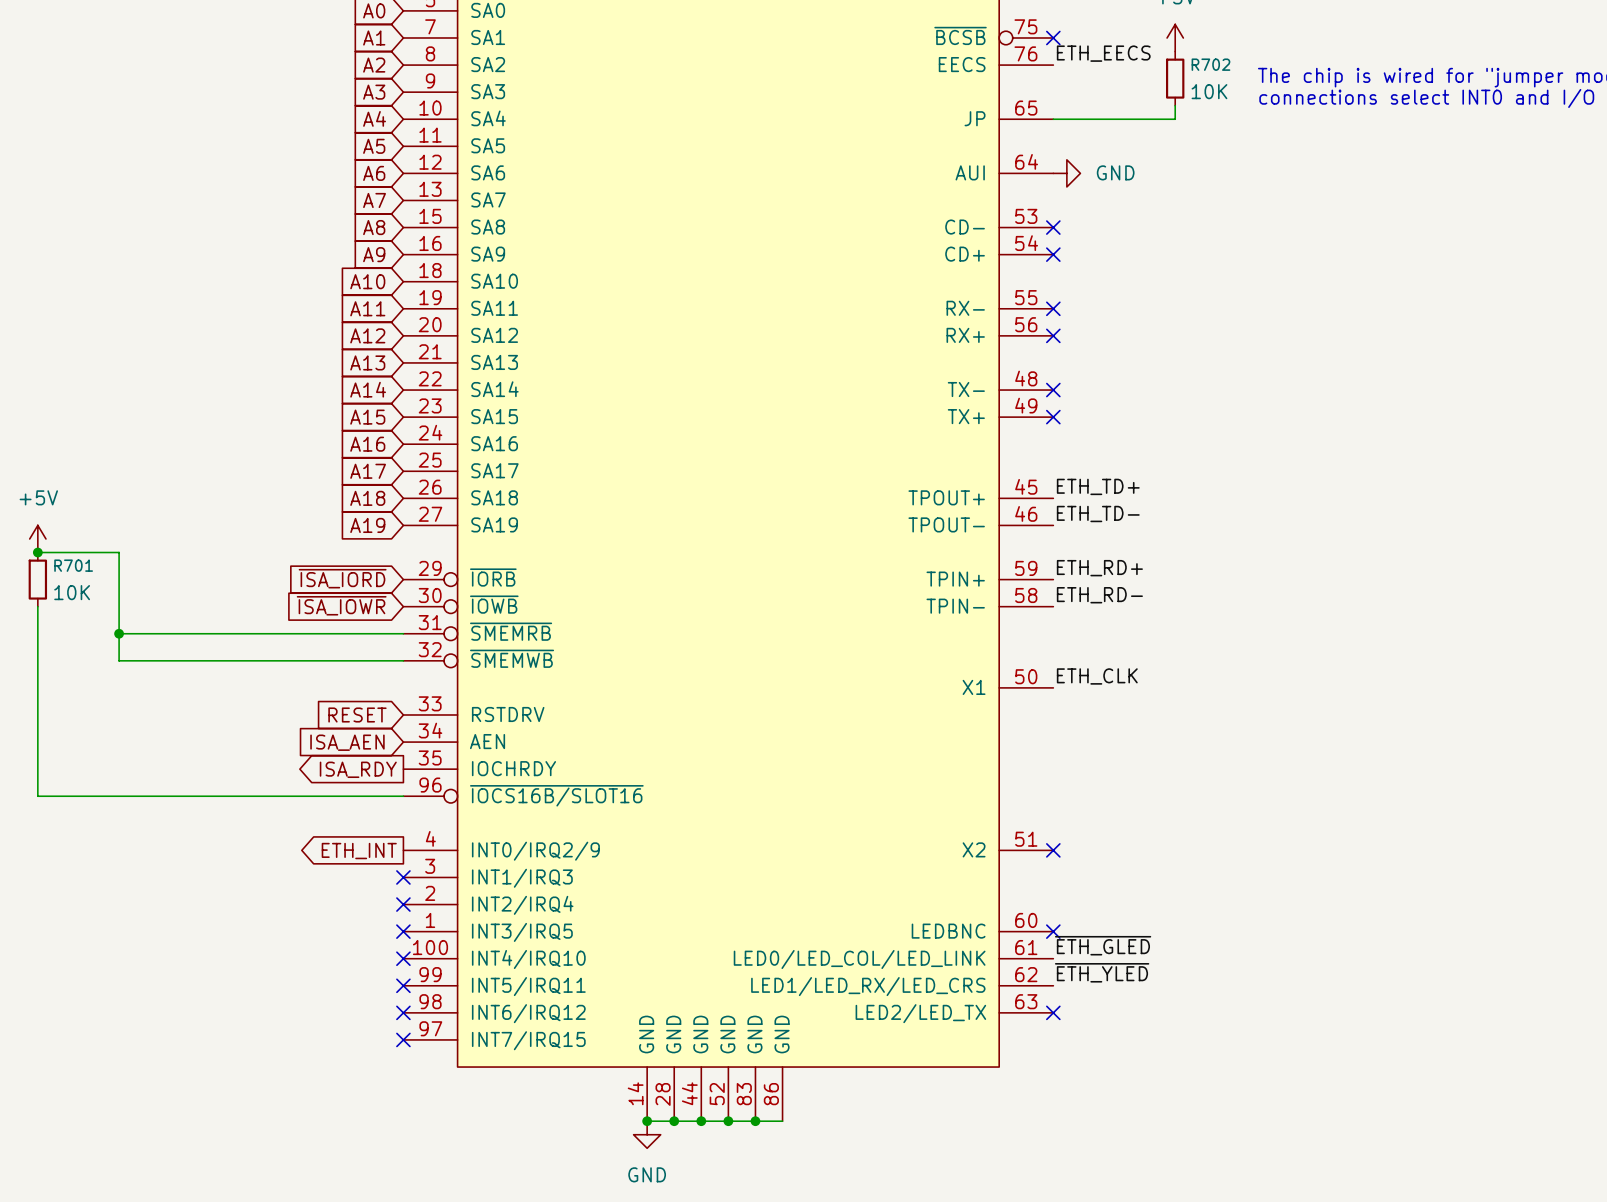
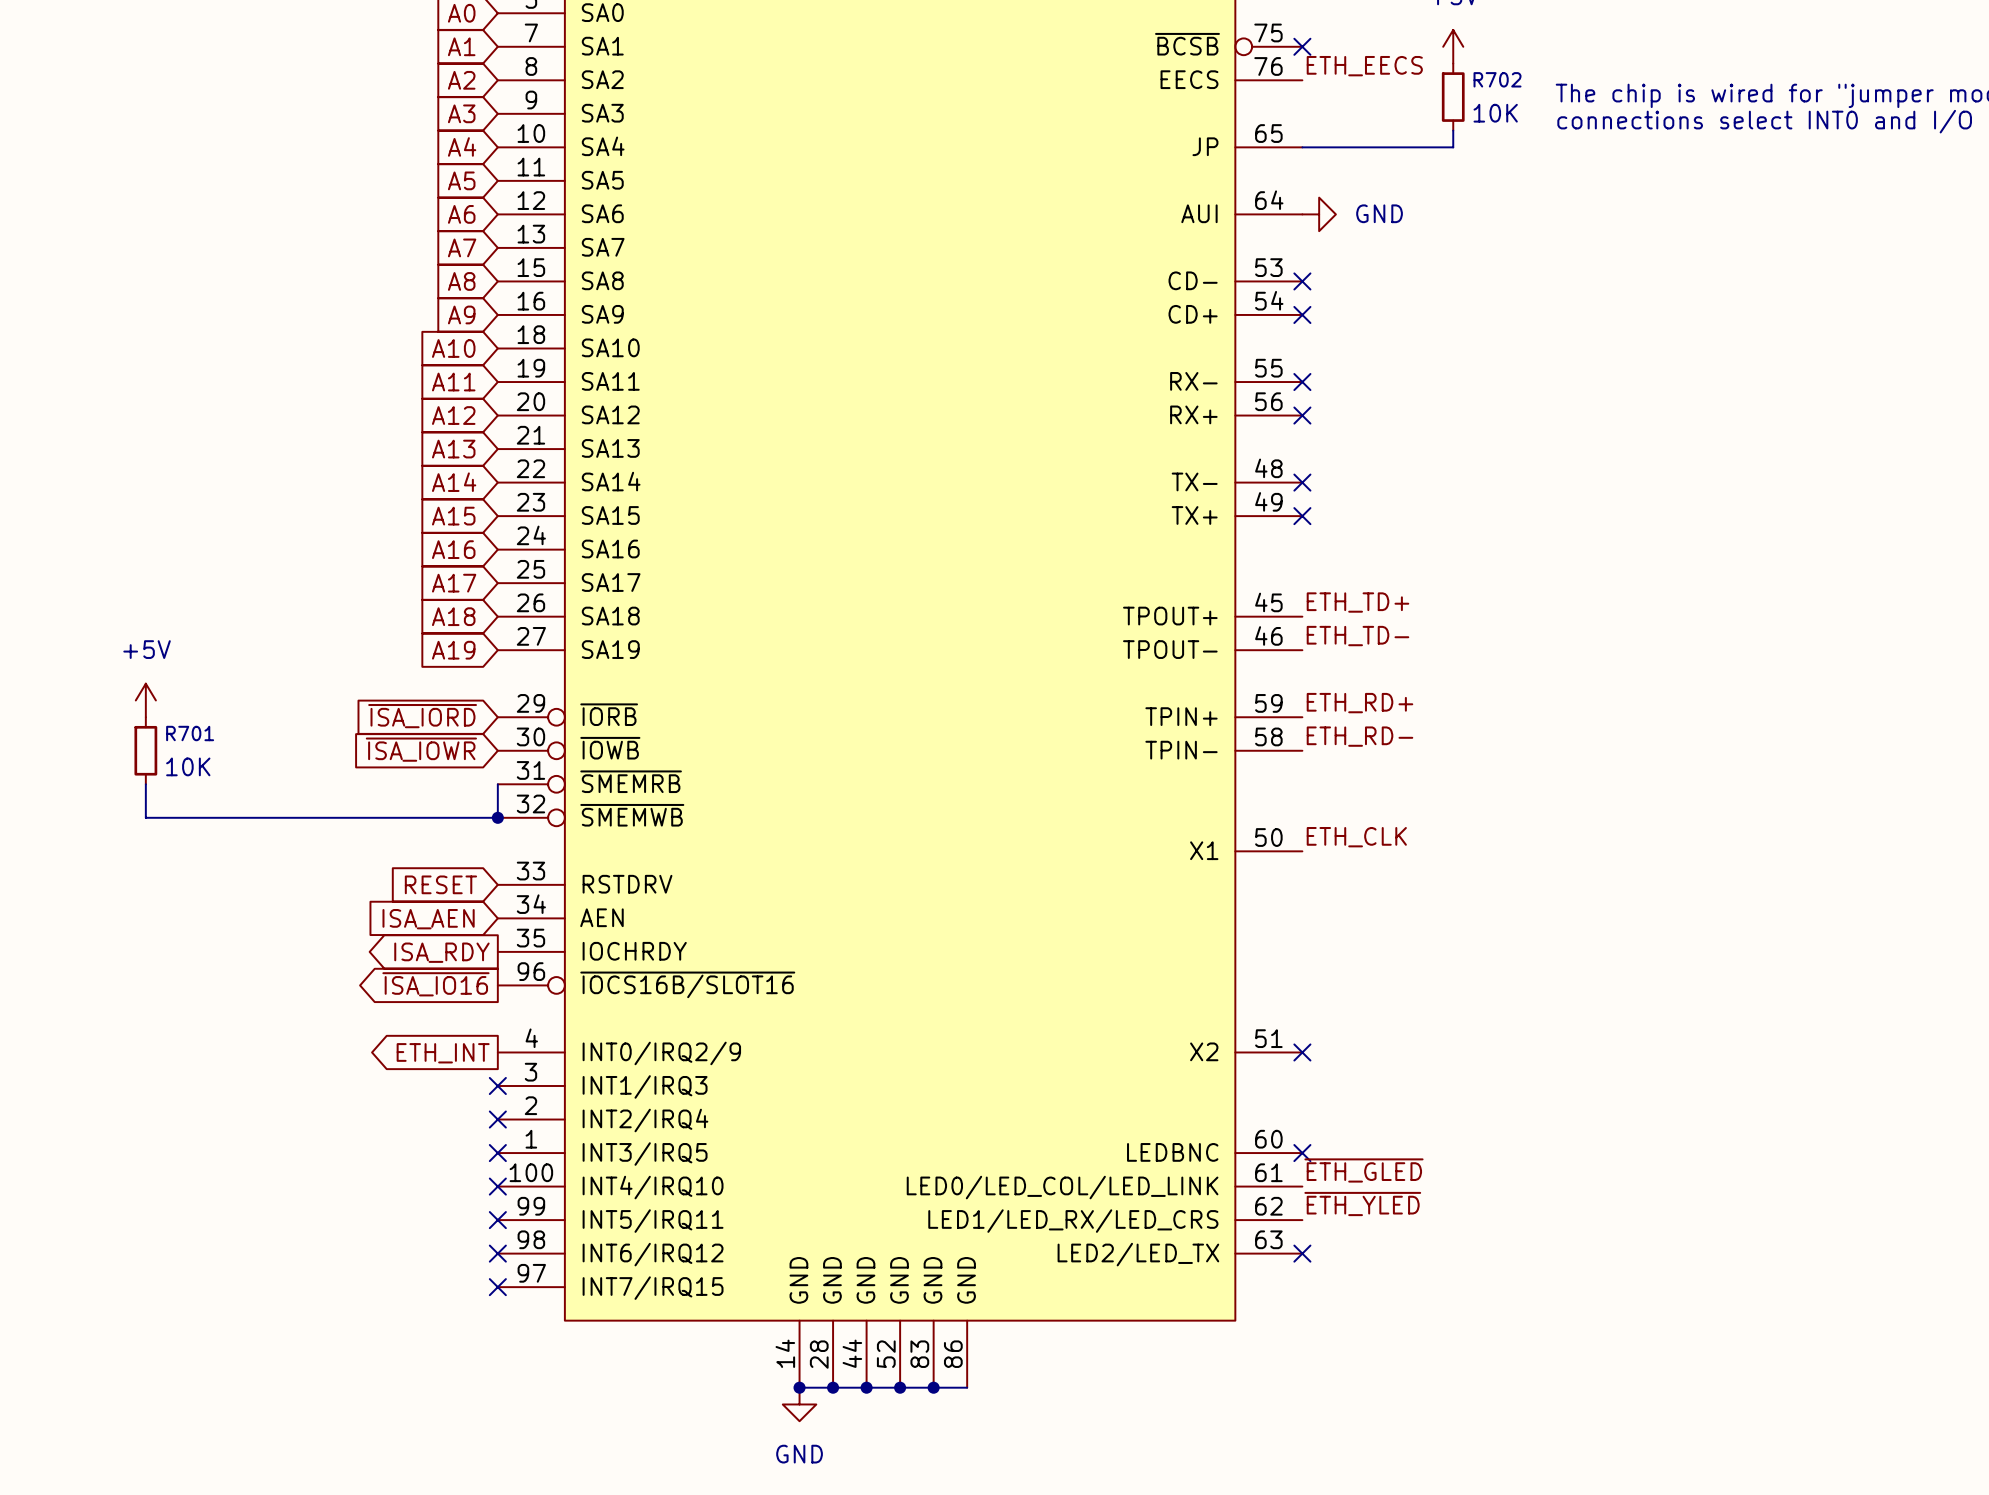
power symbol position: +5V (37, 538) -> +5V (145, 700)
wire: (37, 552) (119, 552) (119, 633) (403, 633) -> (497, 817) (497, 784)
junction: (37, 552) -> none
R701 position: (37, 579) -> (145, 750)
wire: (37, 606) (37, 796) (403, 796) -> none
junction: (119, 633) -> none
junction: none -> (497, 817)
global label: none -> ~{ISA_IO16} (435, 984)

